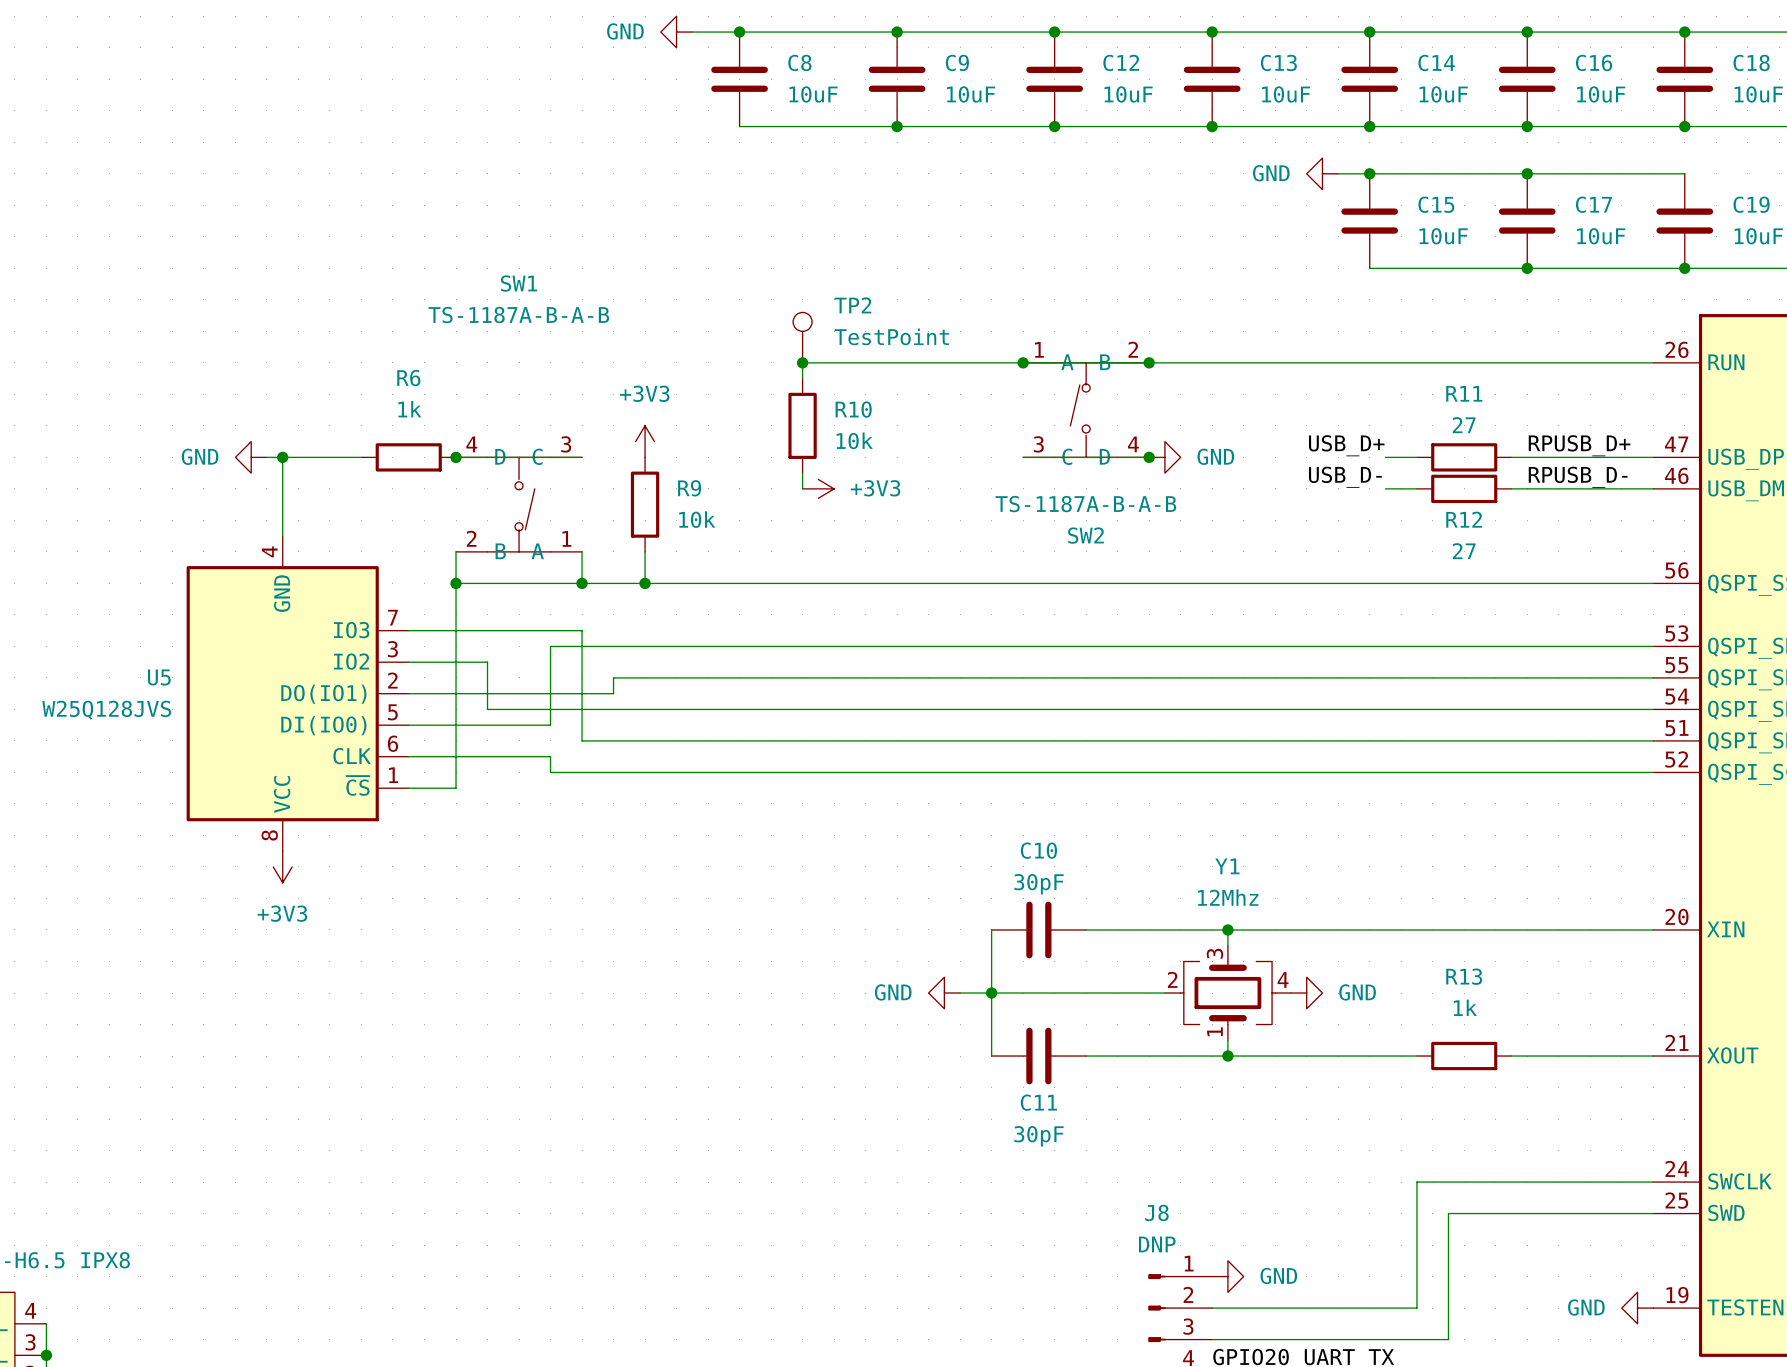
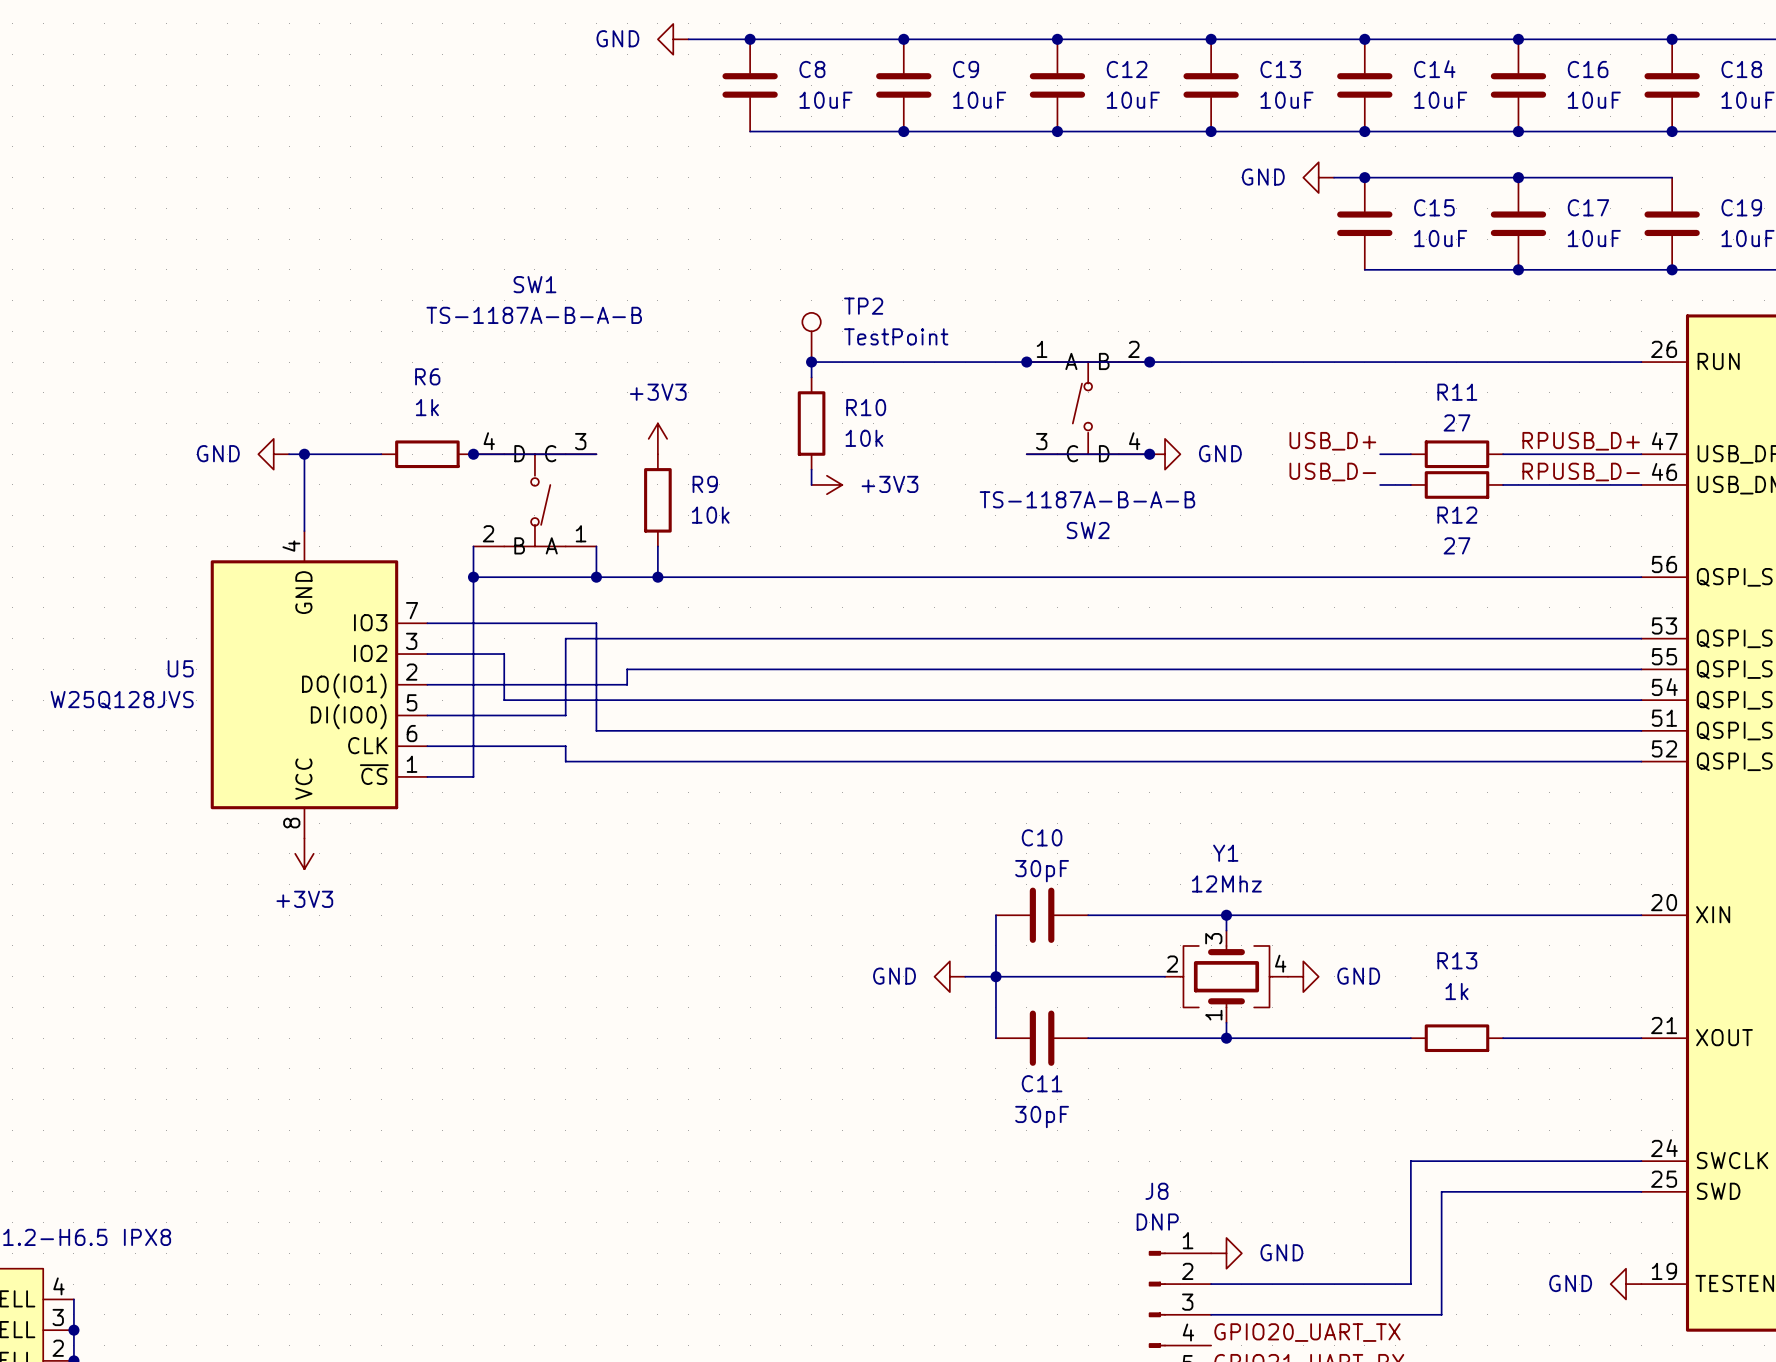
power symbol position: GND (676, 32) -> GND (673, 39)

